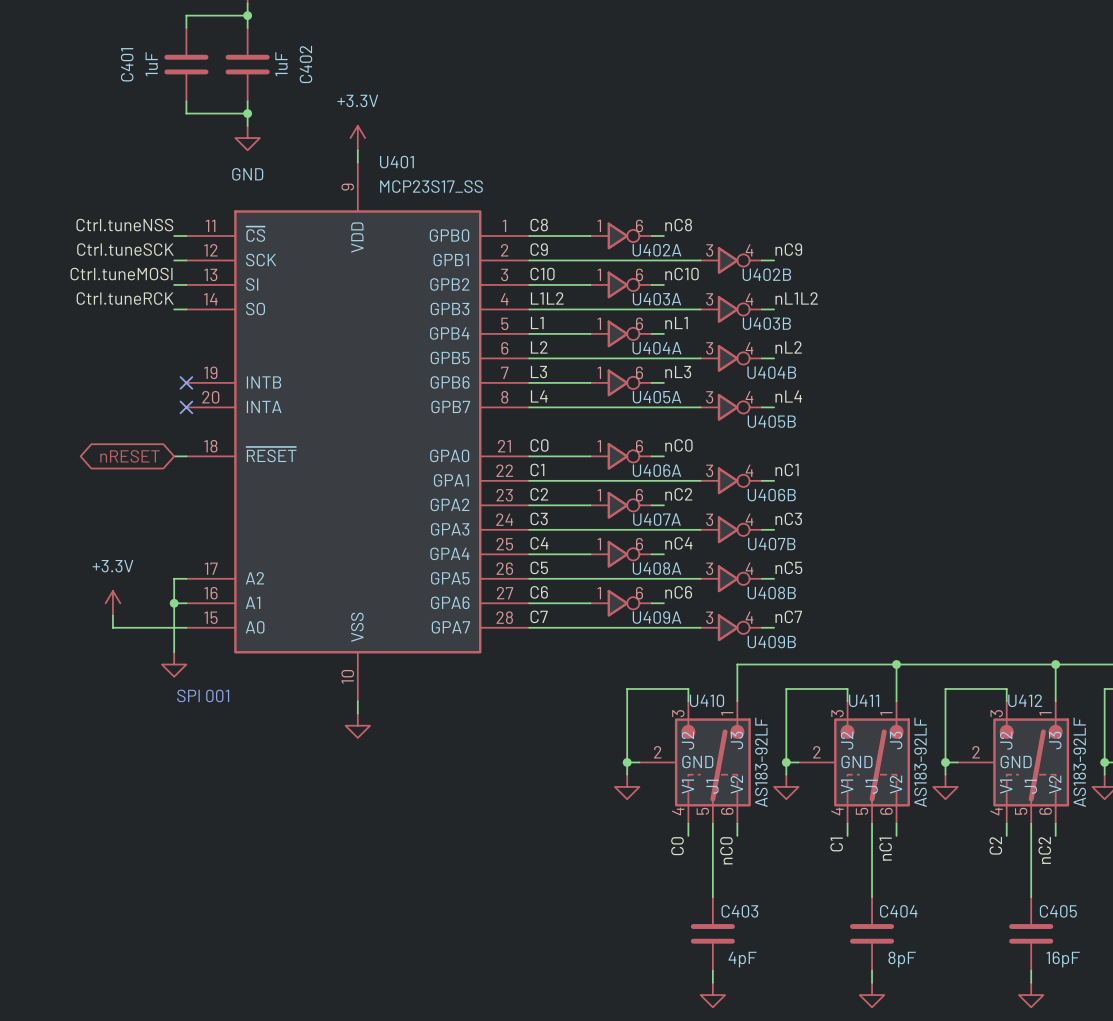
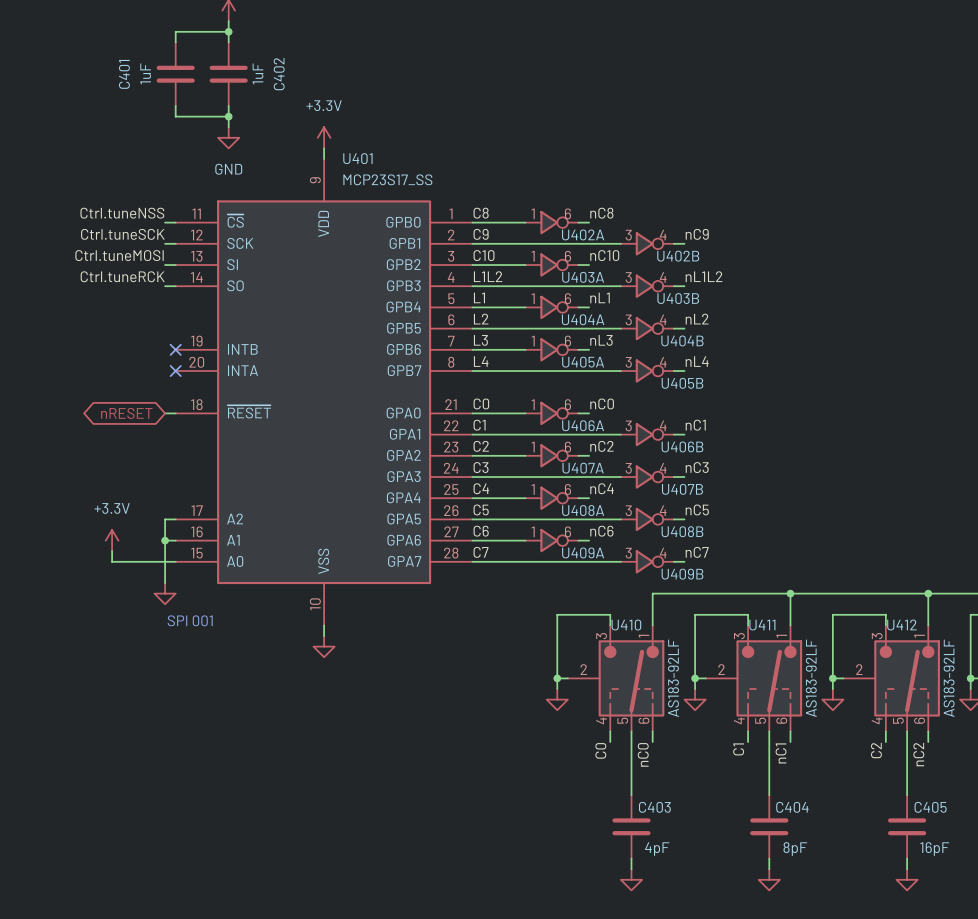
U410 pin name: J2 (687, 740) -> none
U410 pin name: J3 (736, 740) -> none
U411 pin name: J2 (847, 740) -> none
U411 pin name: J3 (896, 740) -> none
U412 pin name: J2 (1006, 740) -> none
U412 pin name: J3 (1055, 740) -> none
U410 pin name: GND (697, 761) -> none
U411 pin name: GND (856, 761) -> none
U412 pin name: GND (1016, 761) -> none
U410 pin name: V2 (736, 784) -> none
U411 pin name: V2 (895, 784) -> none
U412 pin name: V2 (1055, 784) -> none
U410 pin name: V1 (687, 786) -> none
U410 pin name: J1 (712, 786) -> none
U411 pin name: V1 (847, 786) -> none
U411 pin name: J1 (871, 786) -> none
U412 pin name: V1 (1006, 786) -> none
U412 pin name: J1 (1030, 786) -> none

